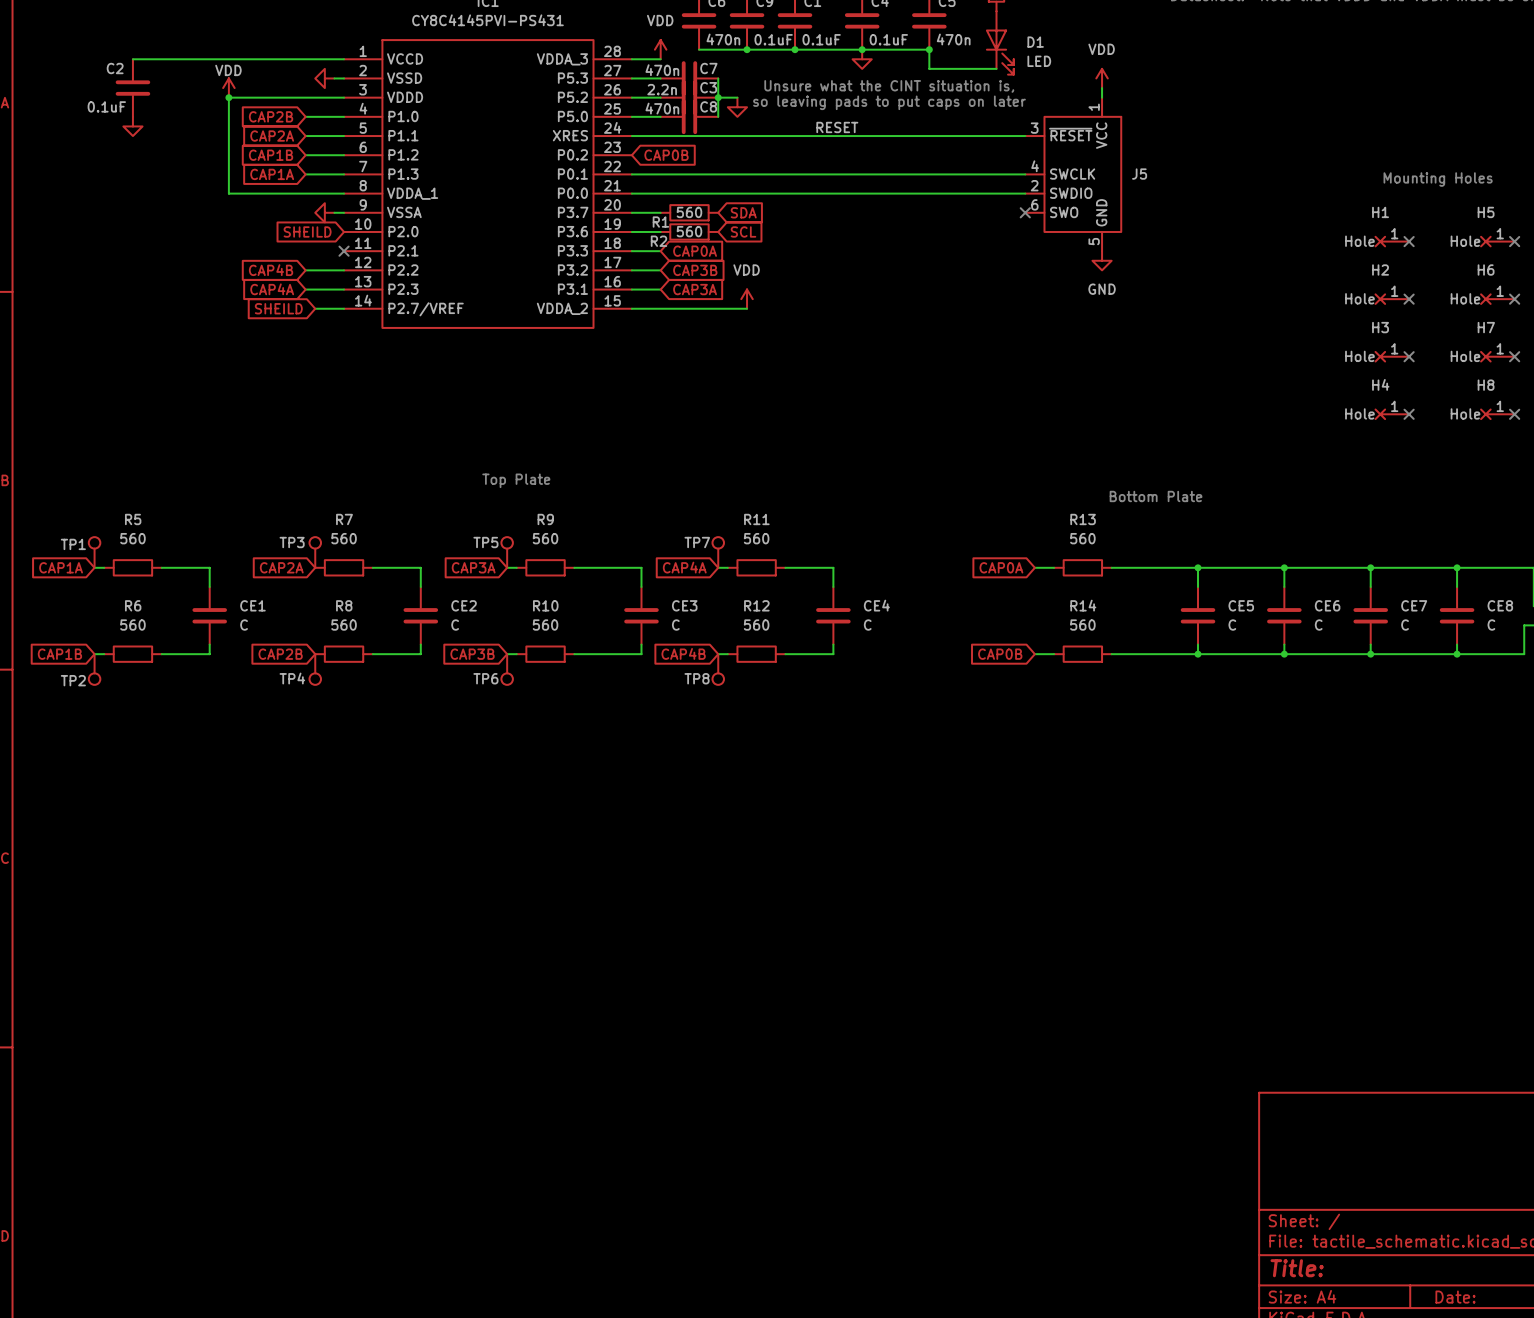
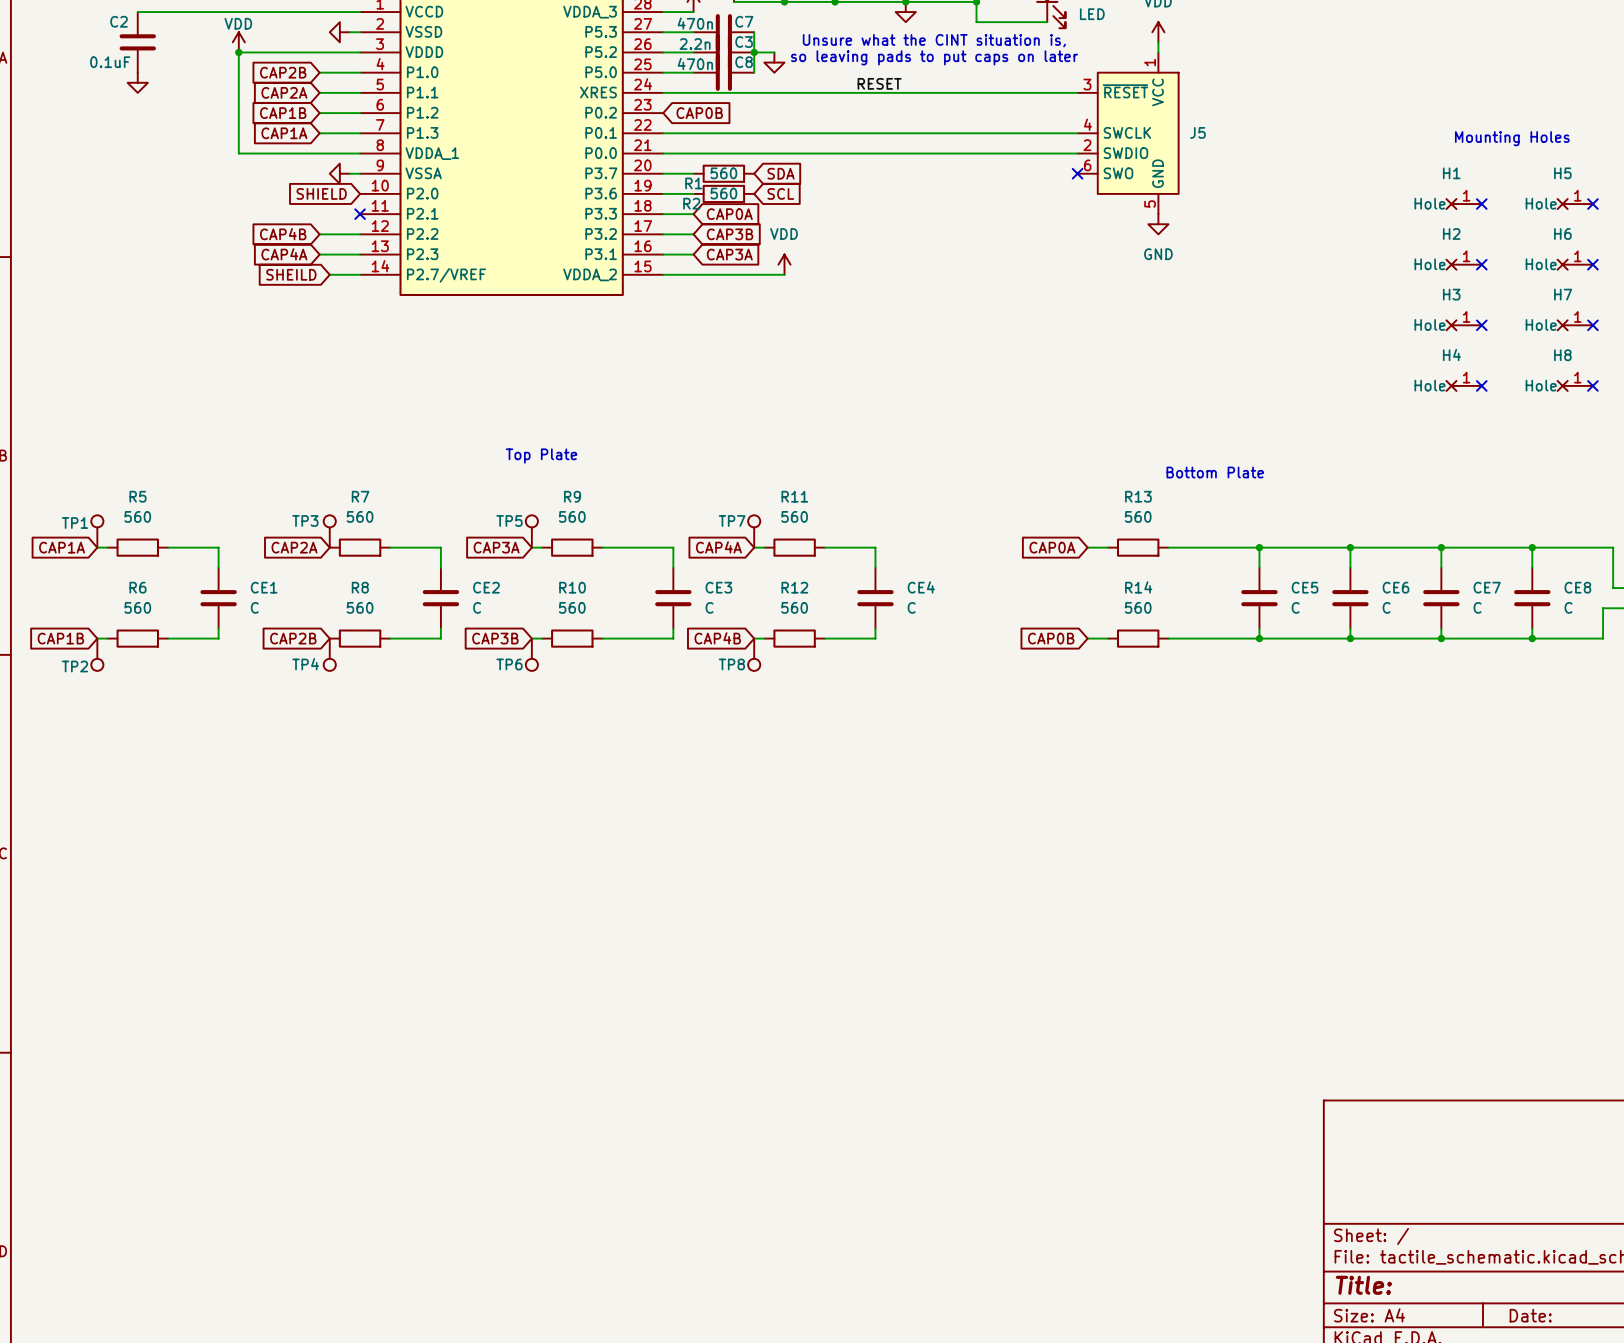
global label: SHEILD (307, 231) -> SHIELD (321, 193)

